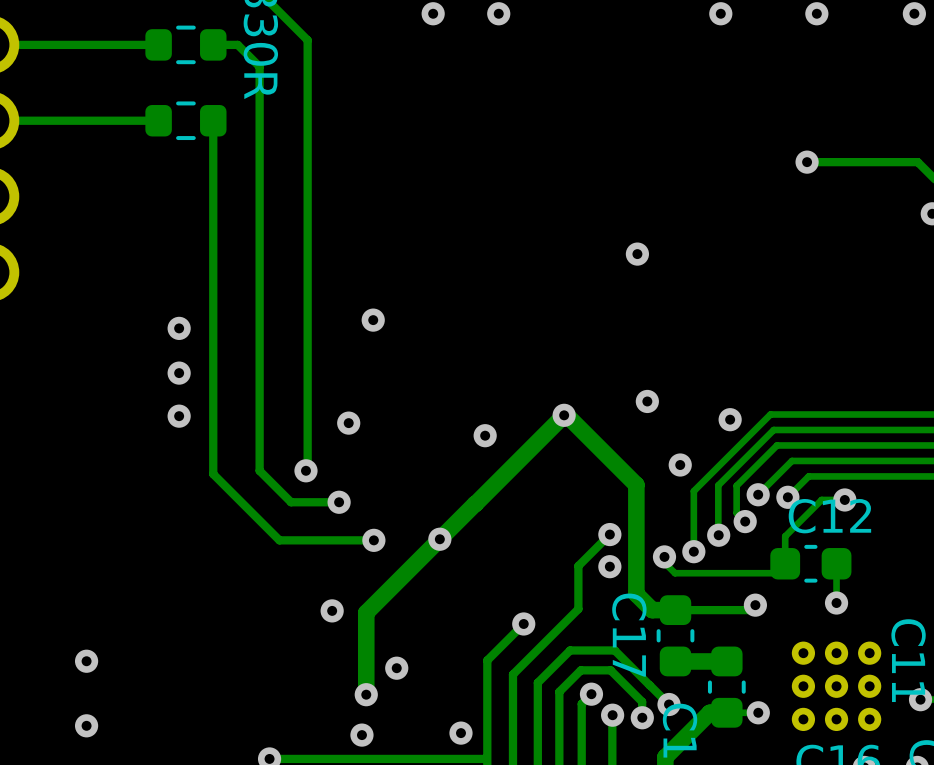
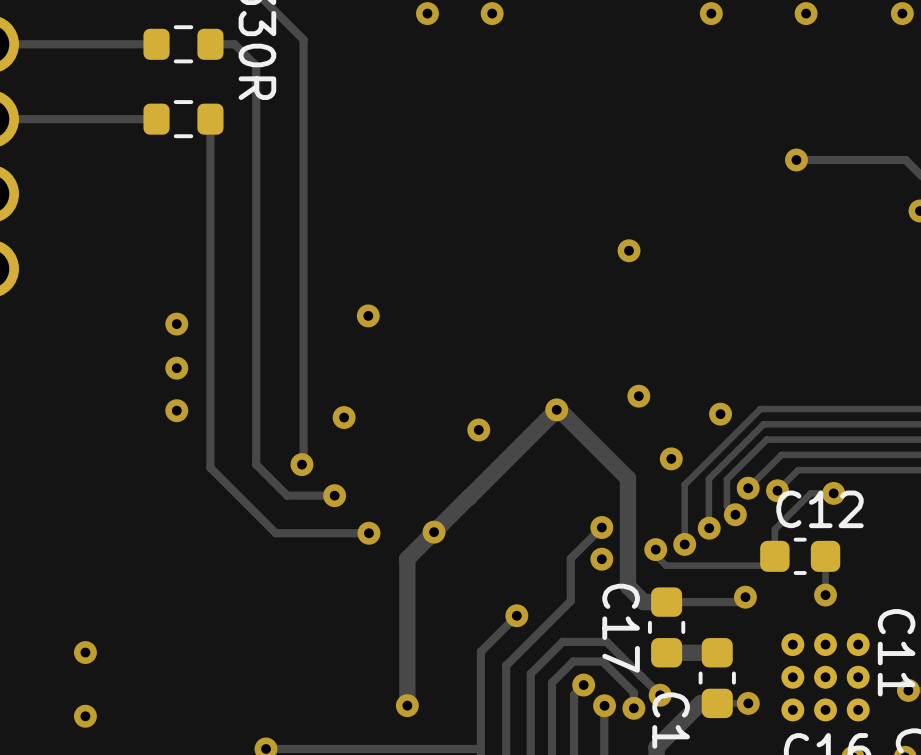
track: (412, 566) (366, 612) (366, 694) -> (407, 558) (407, 705)
via: (332, 610) -> none
via: (396, 668) -> none
via: (366, 694) -> none
via: none -> (407, 705)
via: (460, 733) -> none
via: (361, 735) -> none

